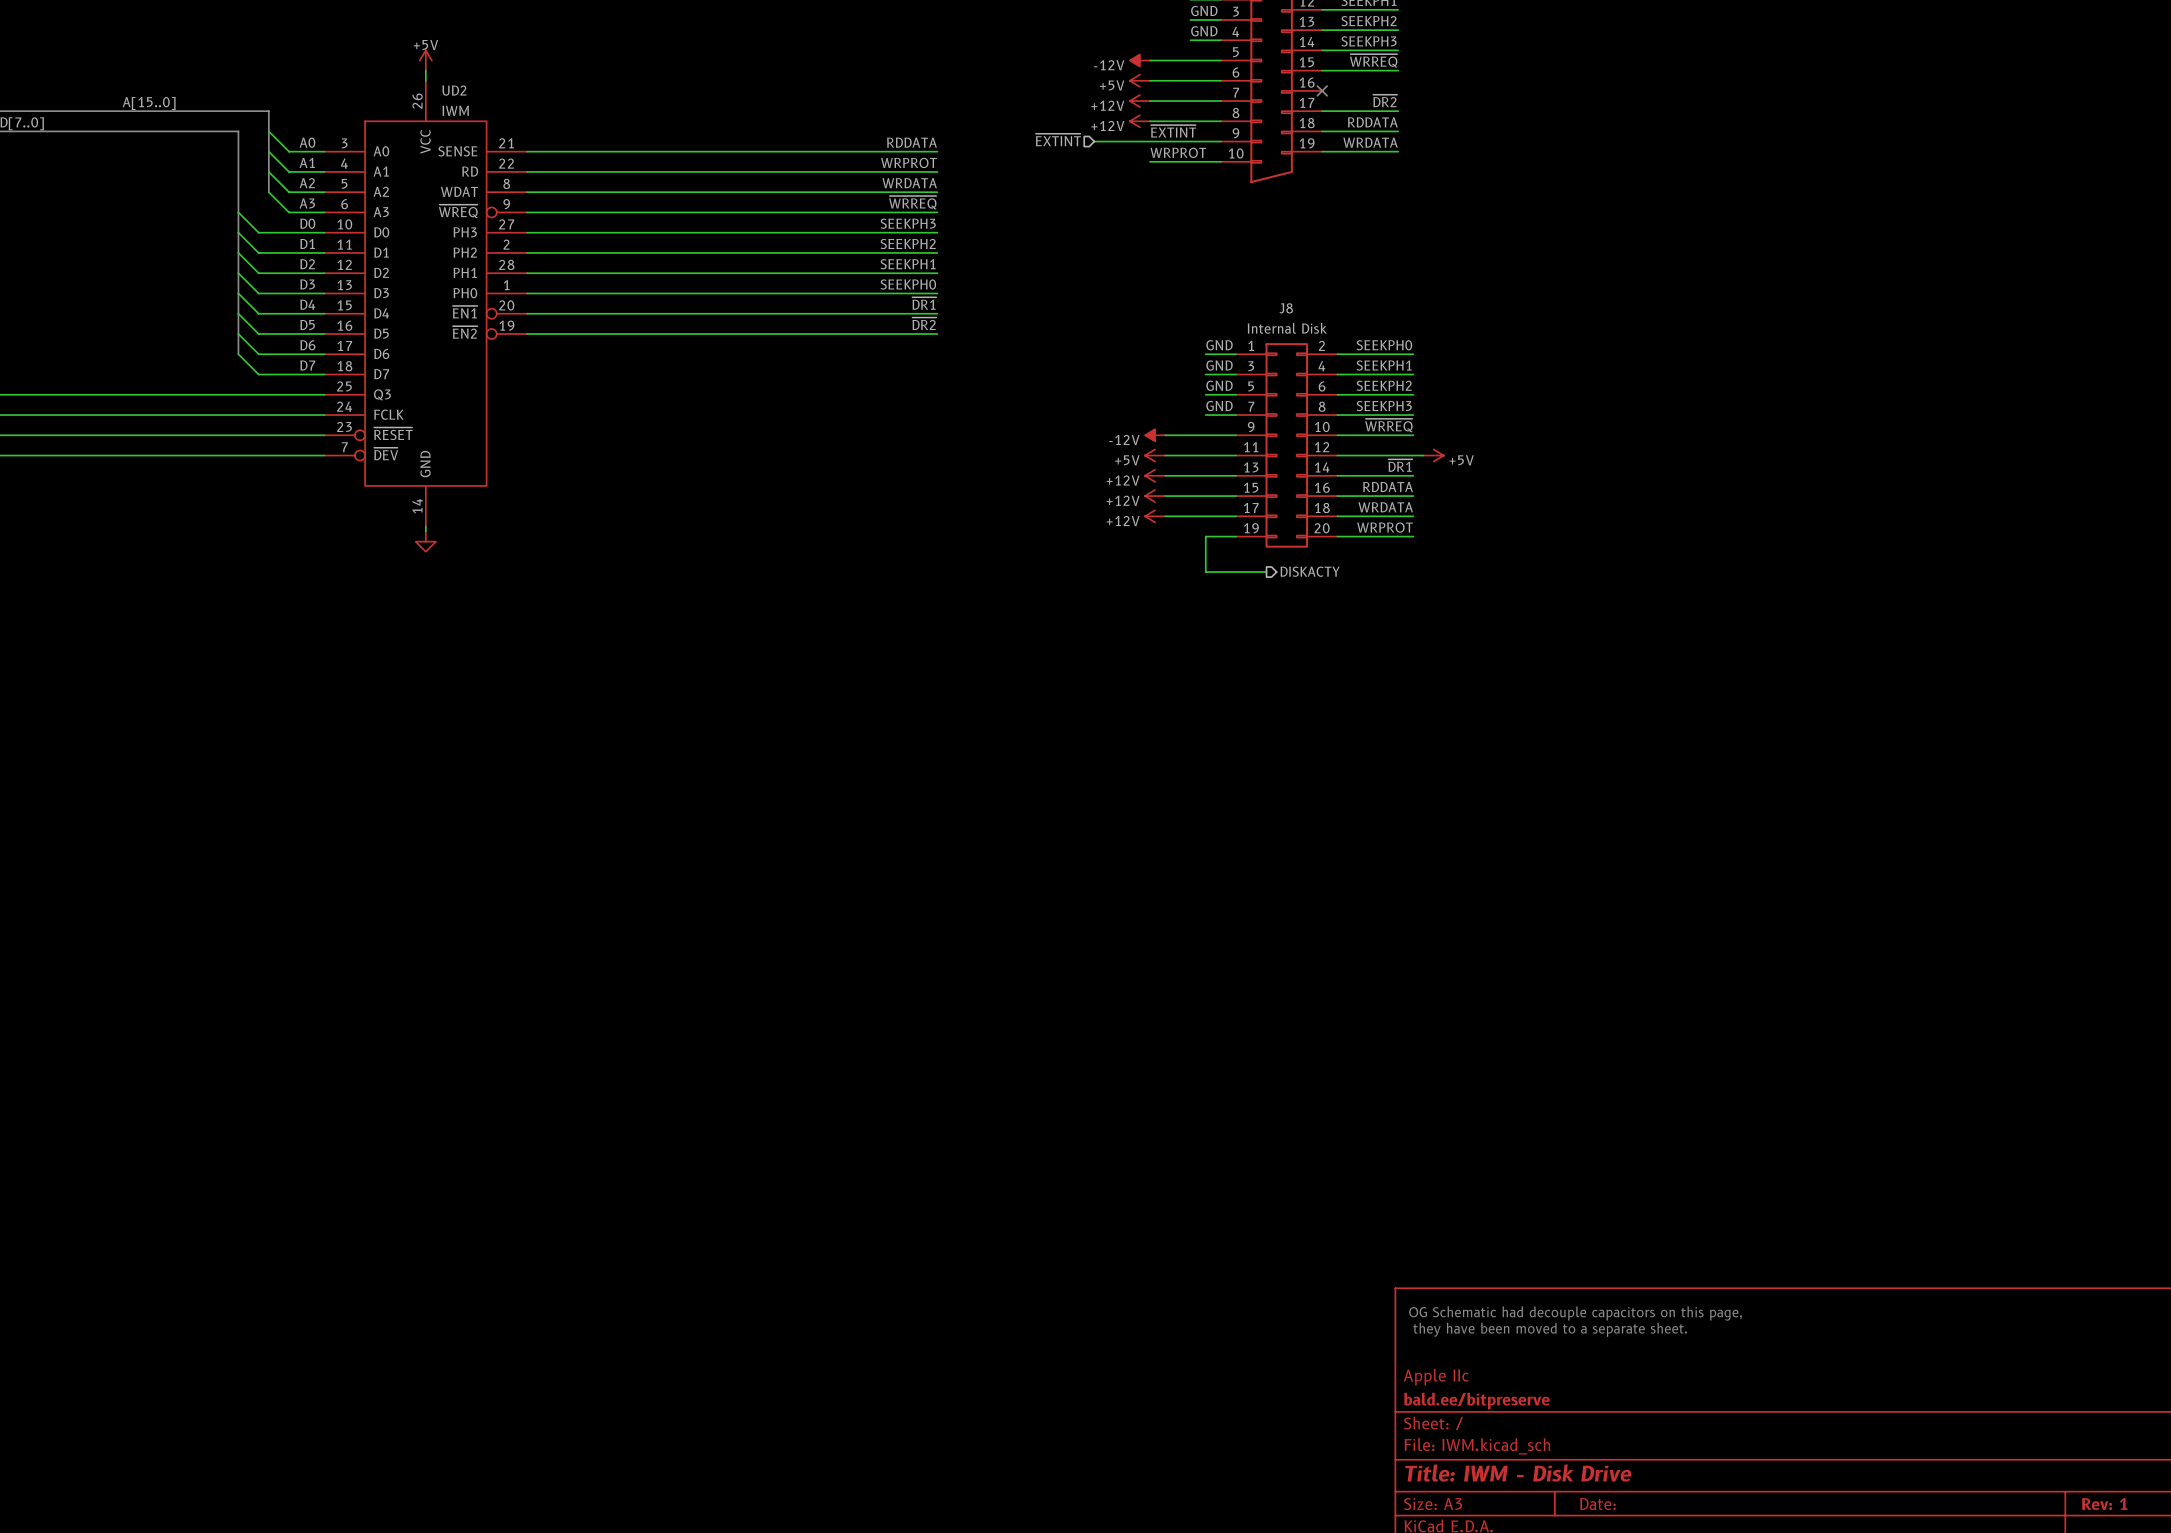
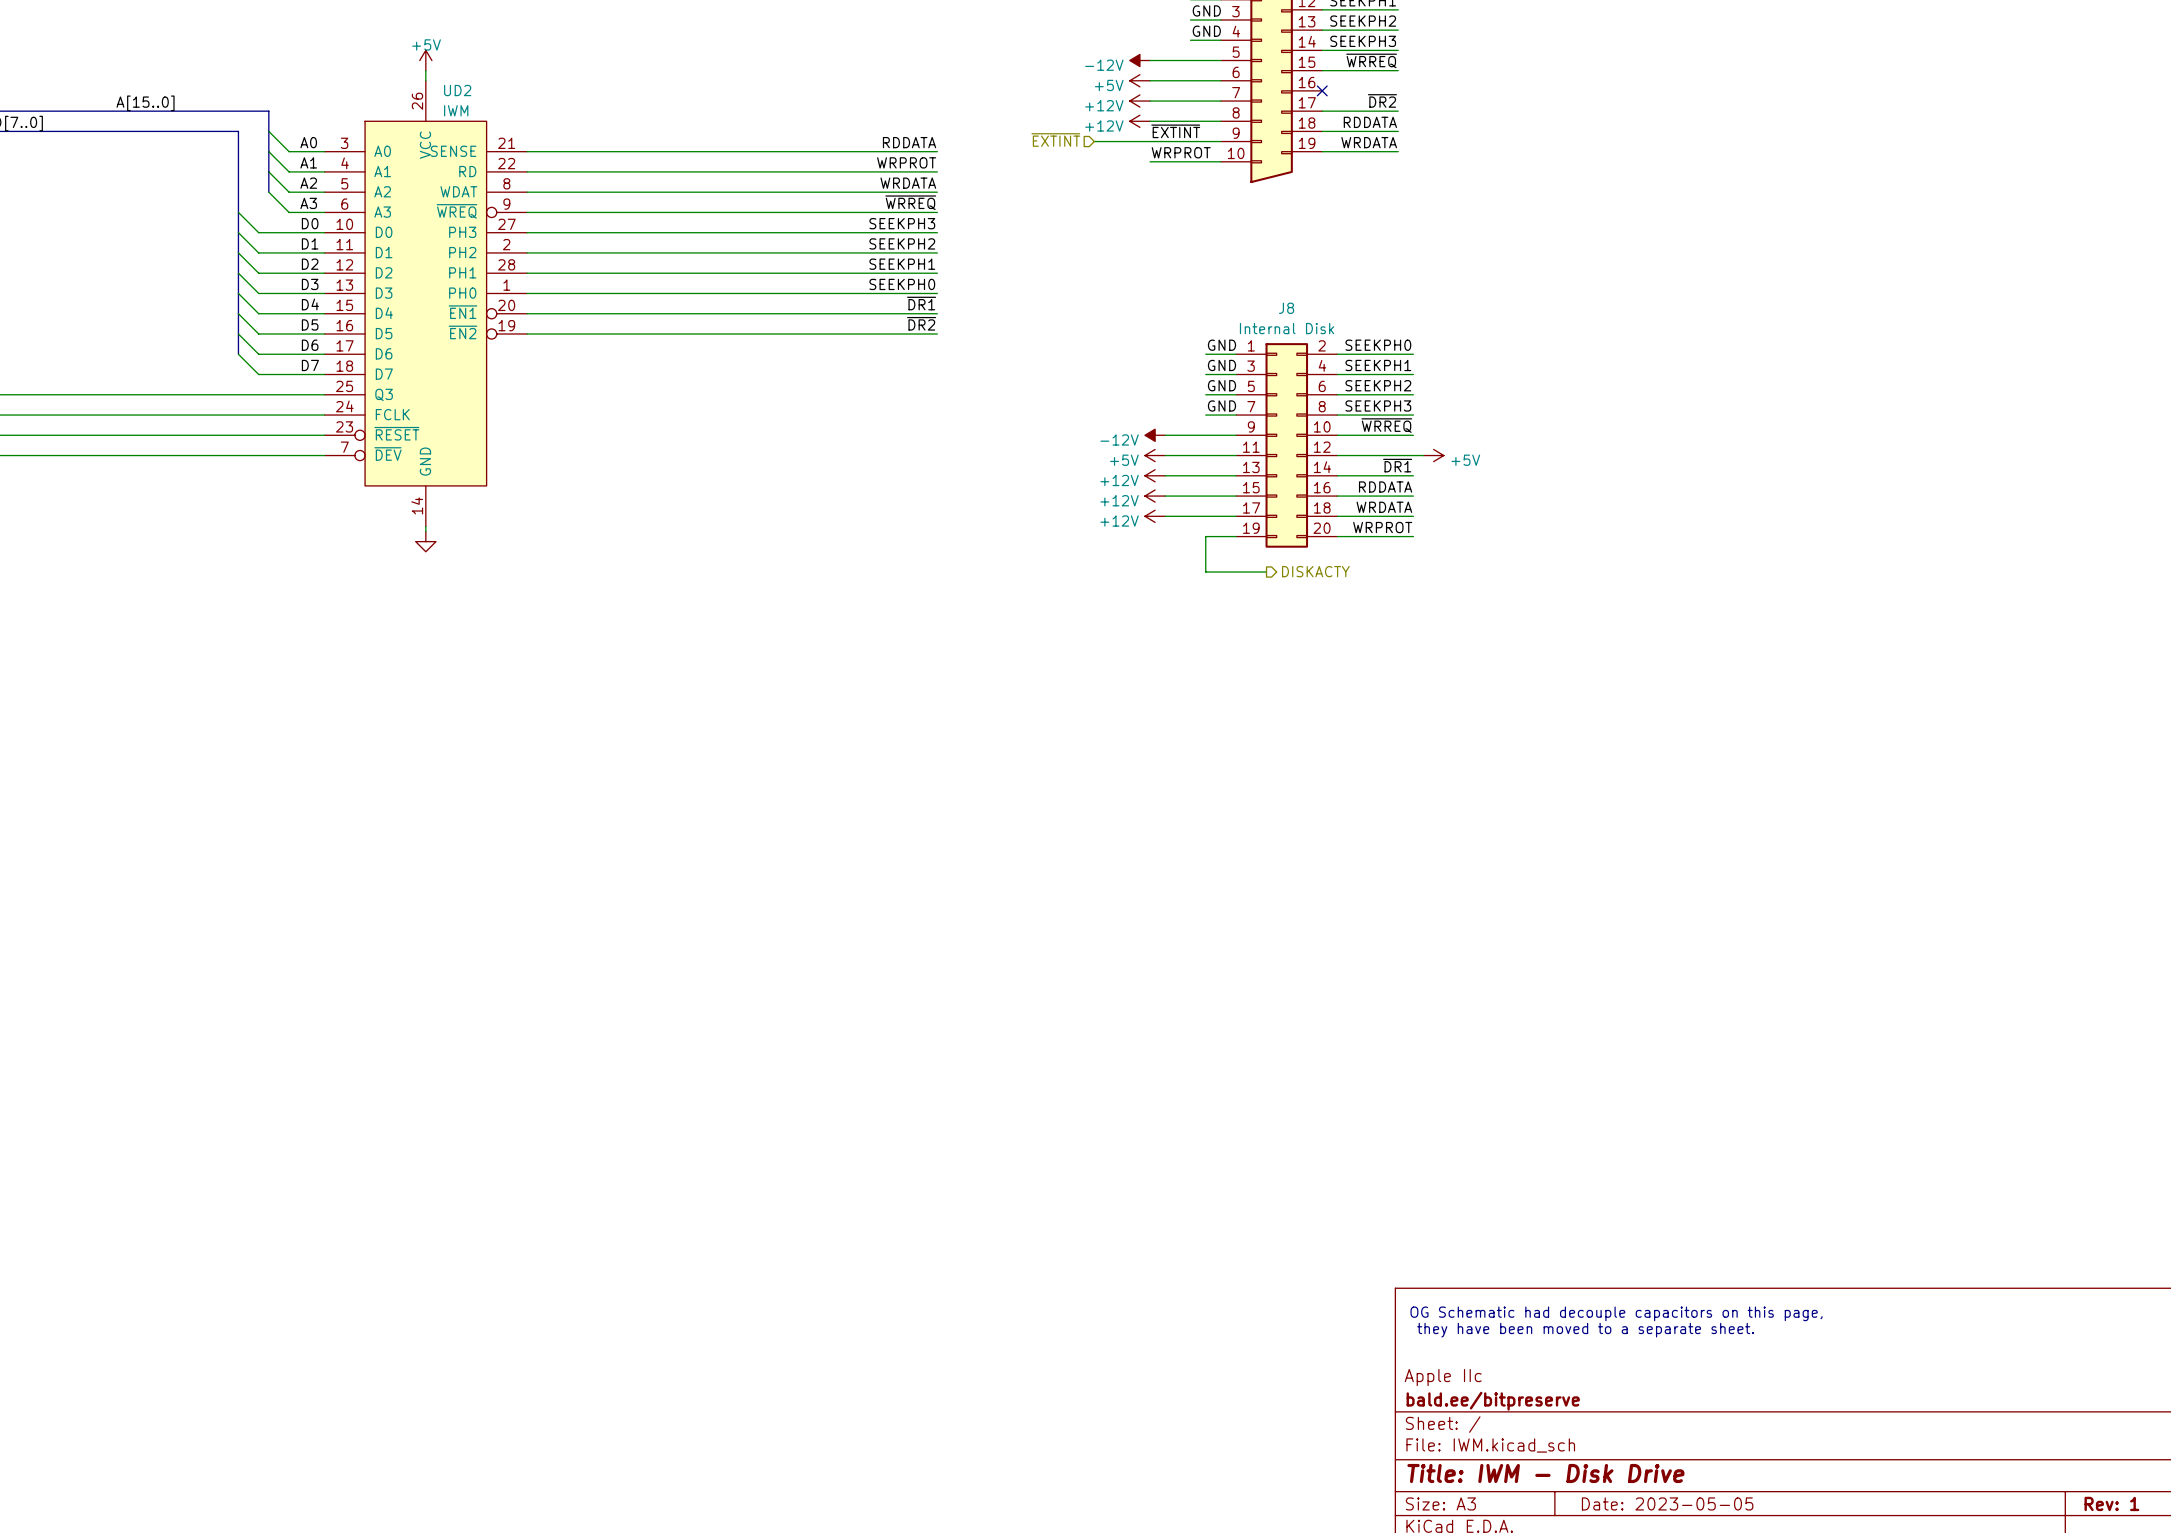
title block: Date: (1597, 1504) -> Date: 2023-05-05 (1667, 1503)

